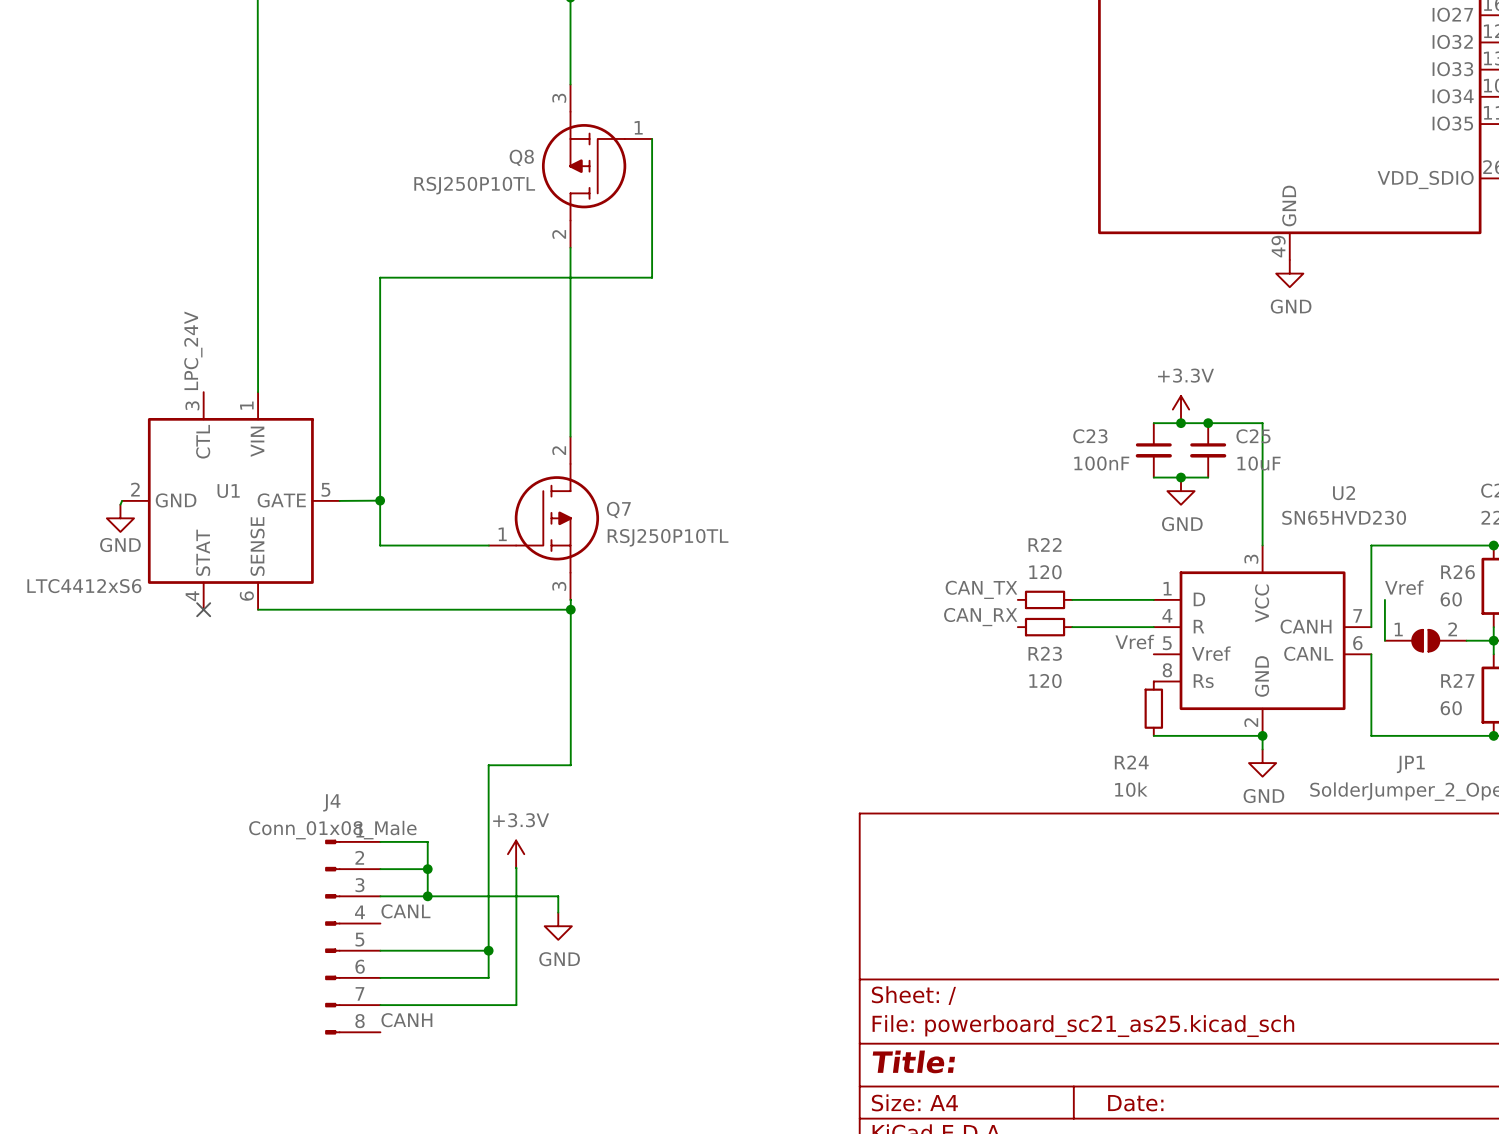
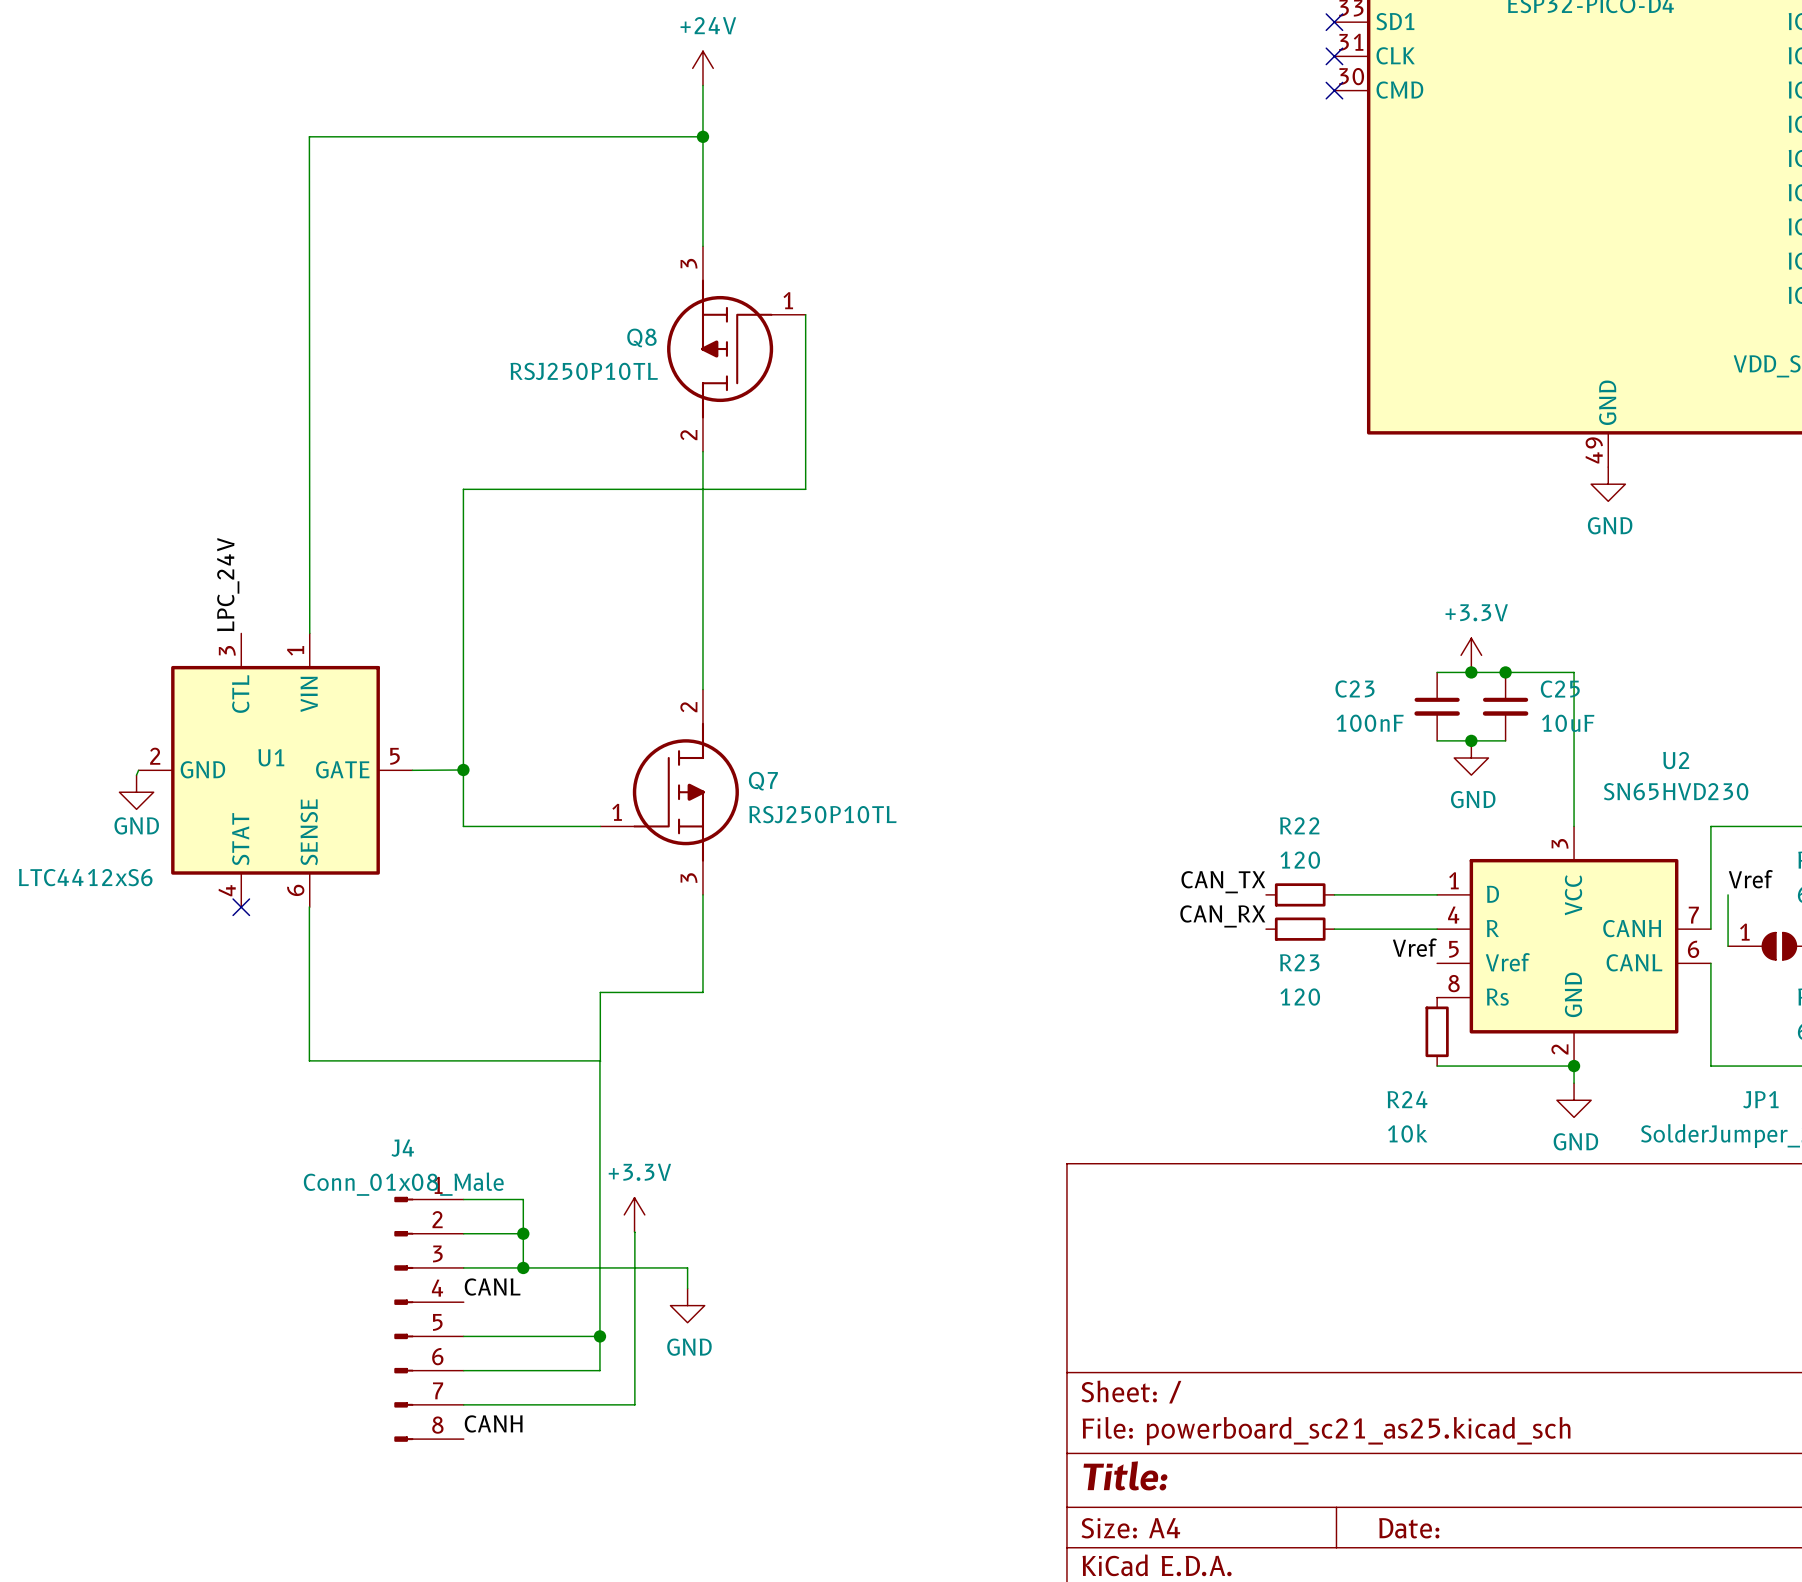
wire: (570, 599) (570, 765) (488, 765) -> (702, 894) (702, 992) (600, 992) (600, 1060)
wire: (258, 609) (570, 609) -> (309, 906) (309, 1060) (600, 1060)
junction: (570, 609) -> none
wire: none -> (599, 1061) (599, 1103)

